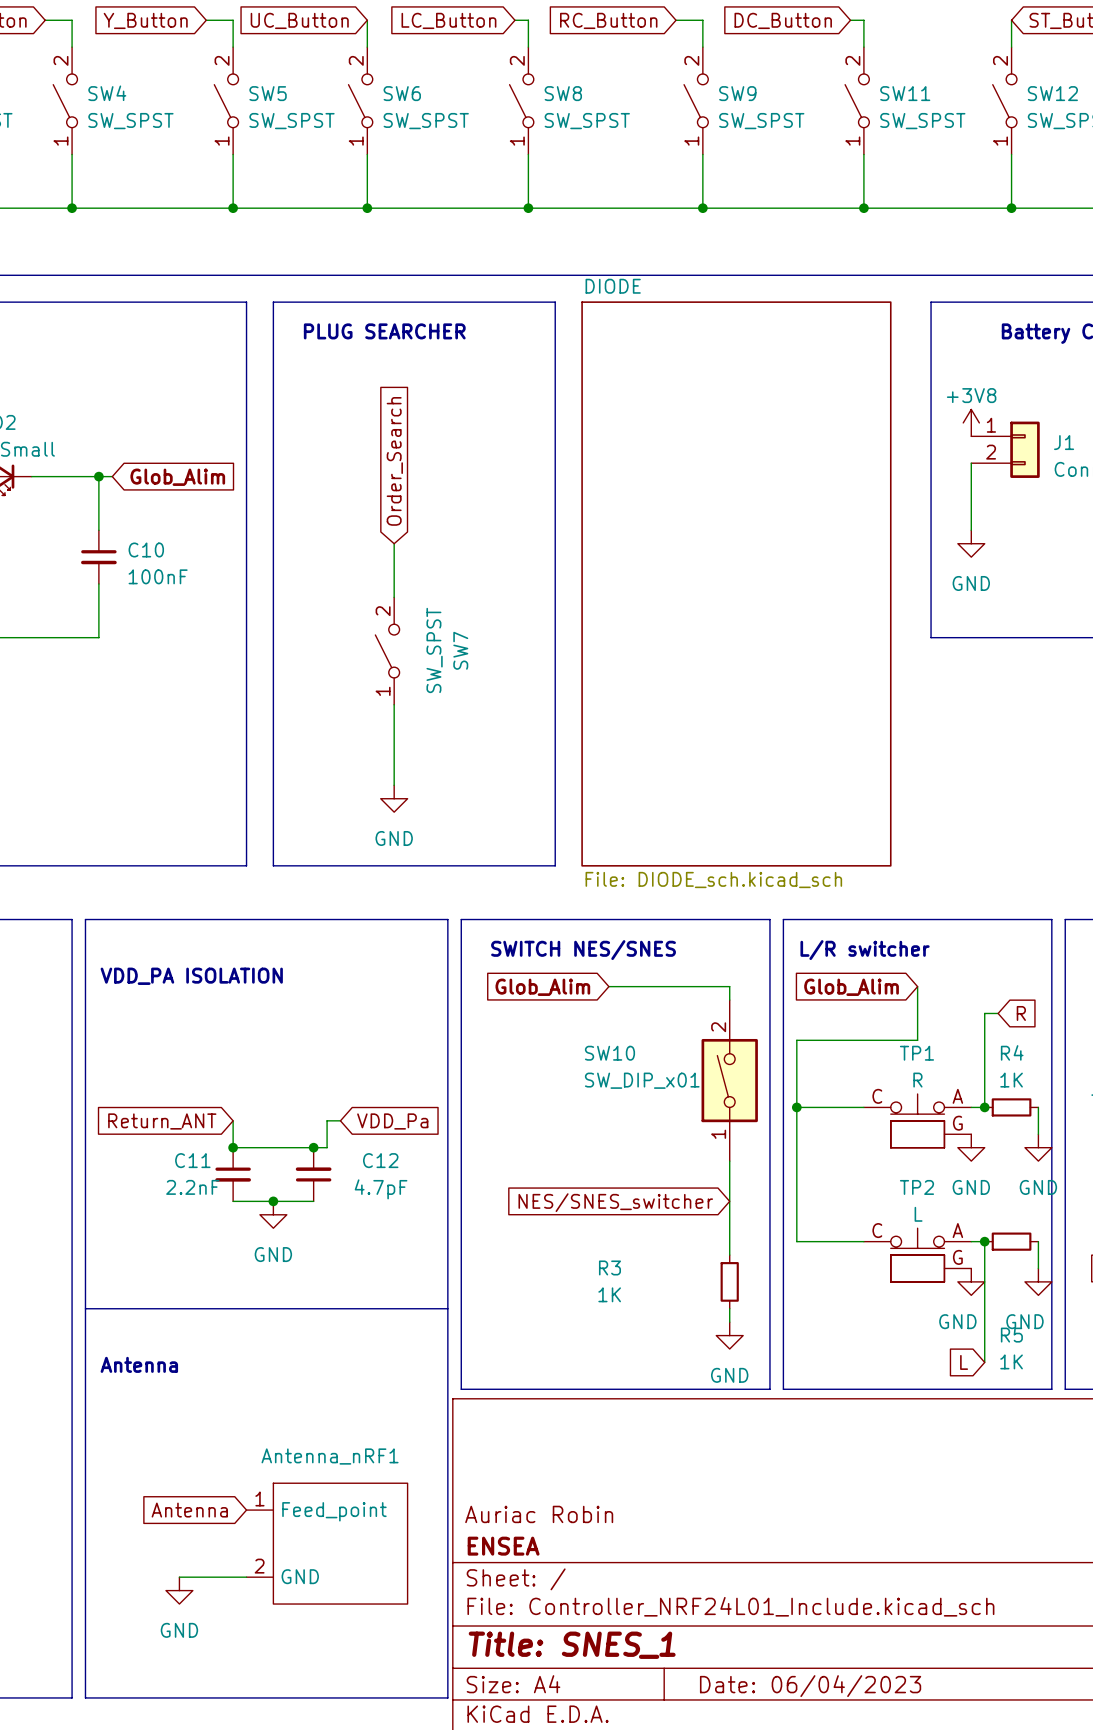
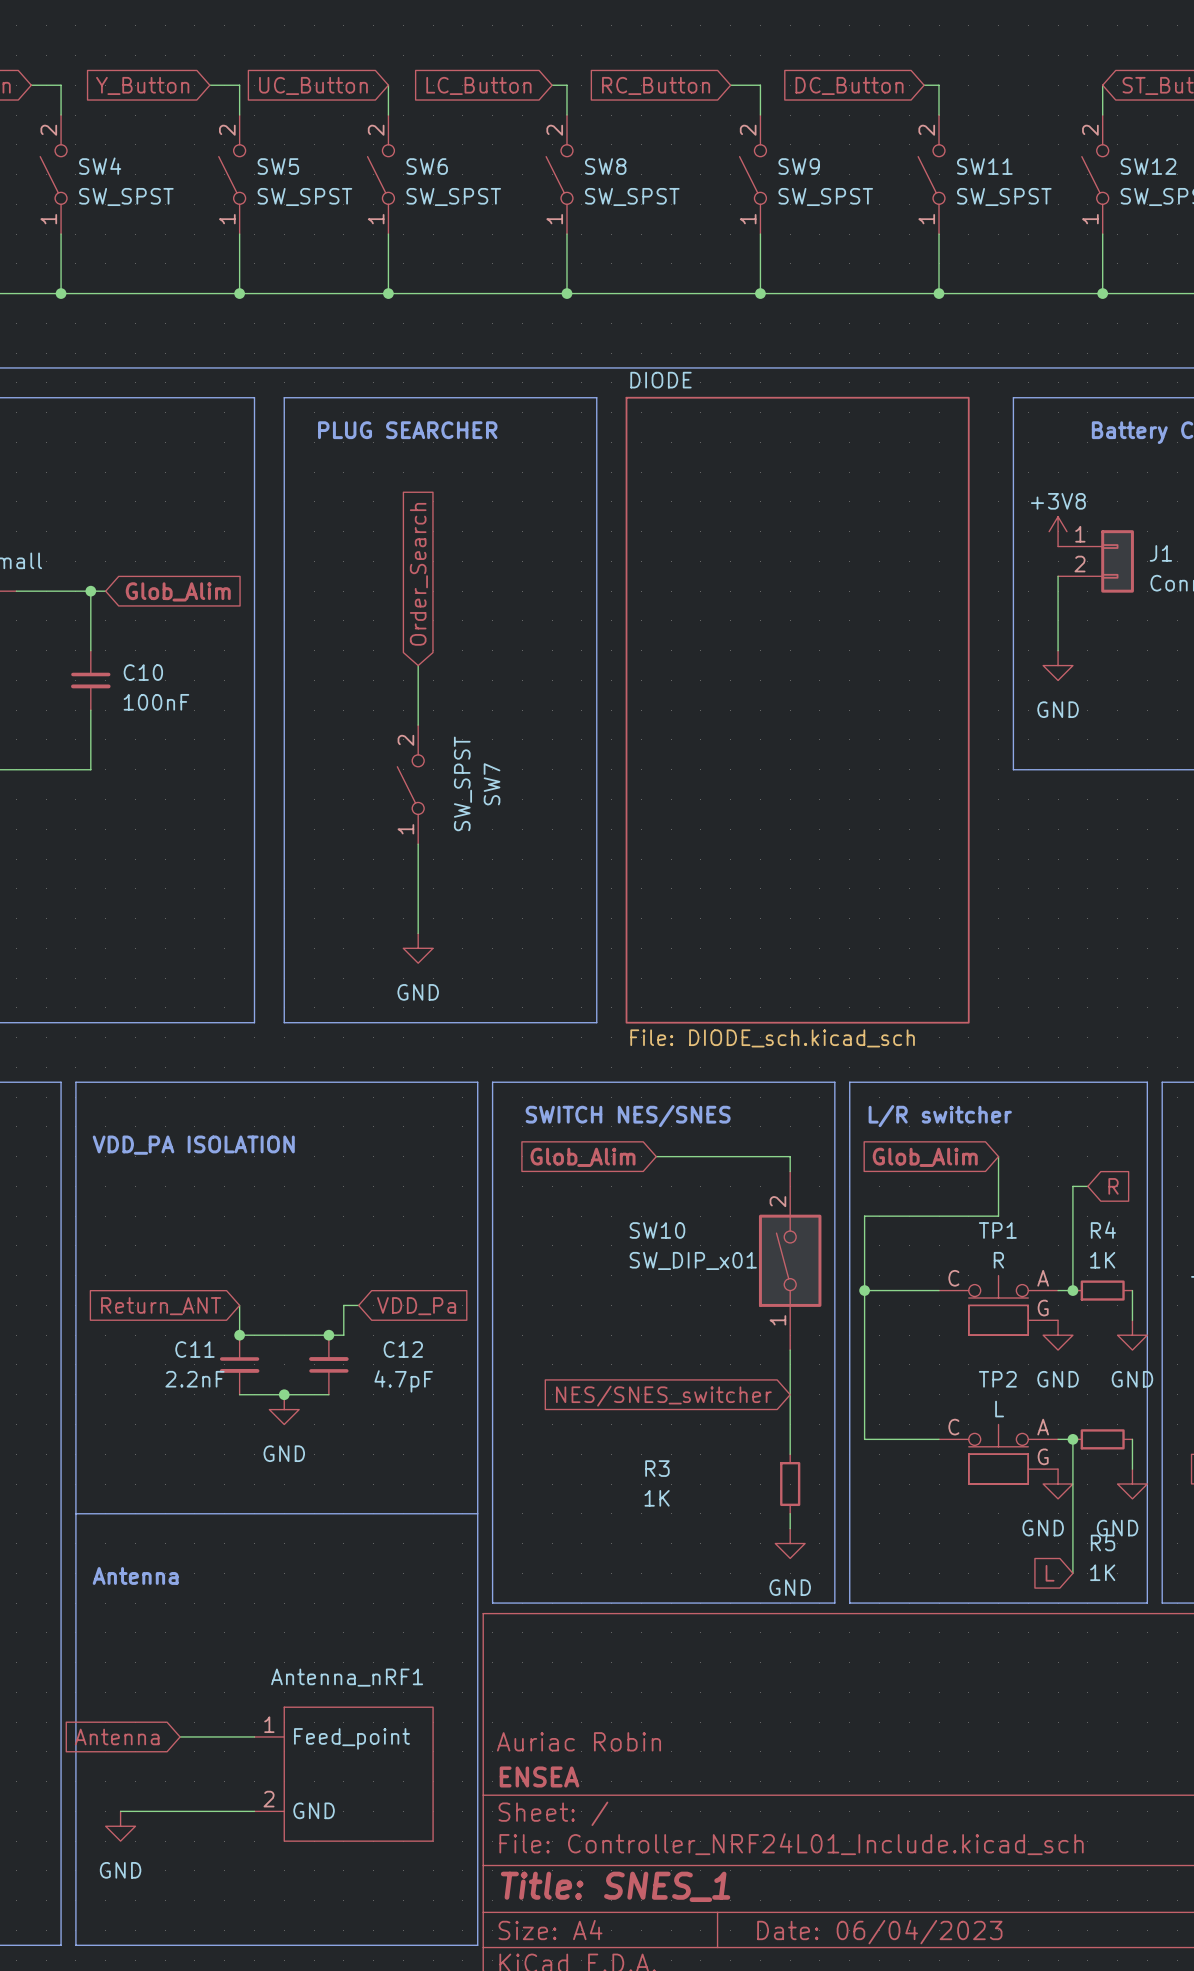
wire: none -> (180, 1736) (254, 1736)
global label position: Antenna (189, 1510) -> Antenna (117, 1736)
wire: none -> (120, 1811) (180, 1811)
power symbol position: GND (179, 1590) -> GND (120, 1826)

